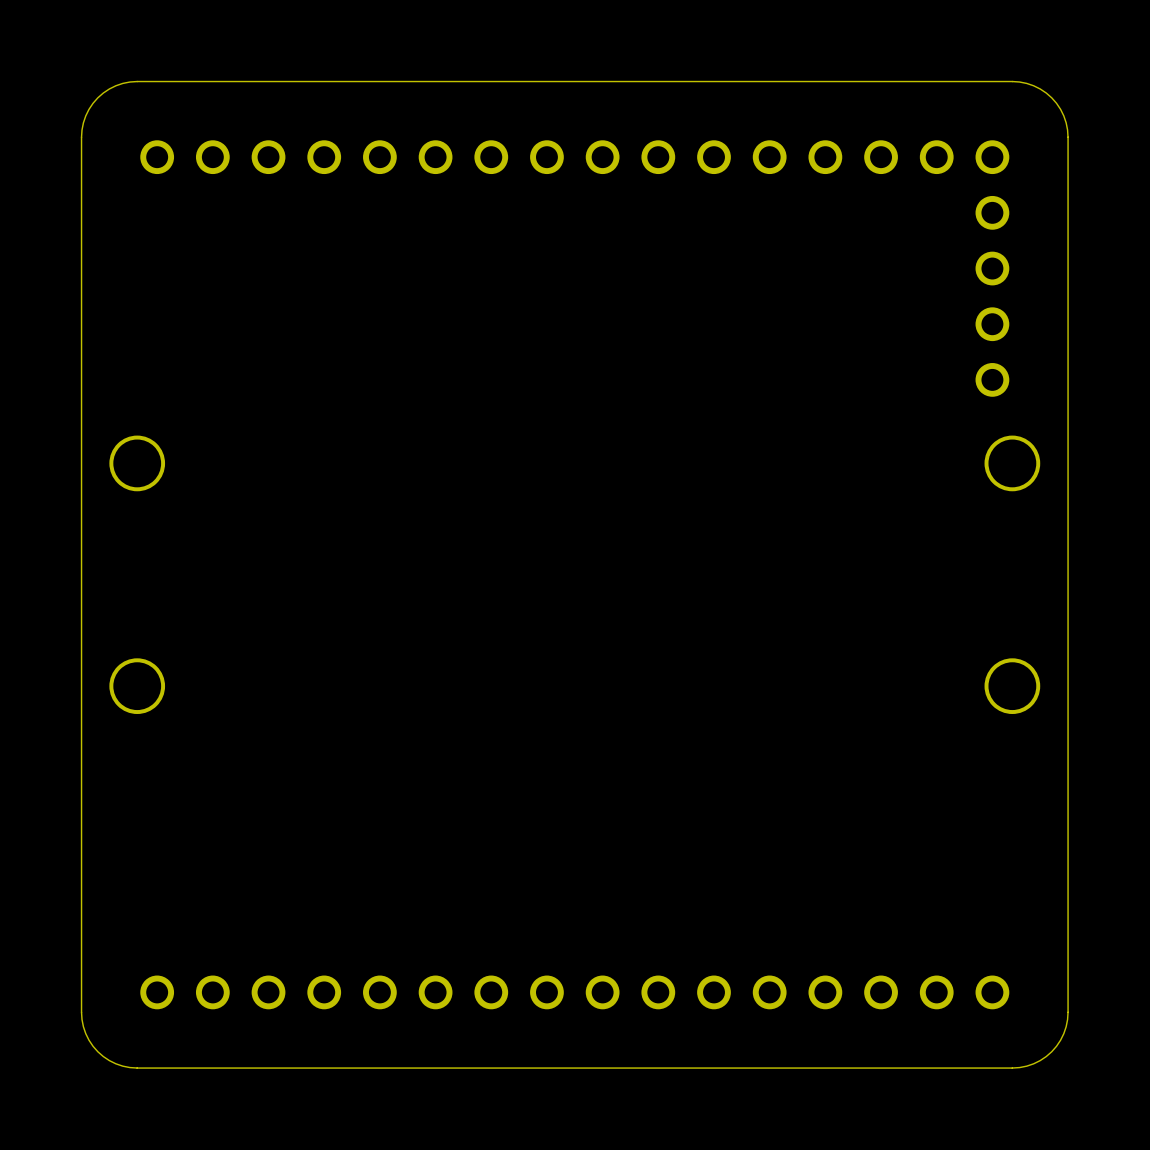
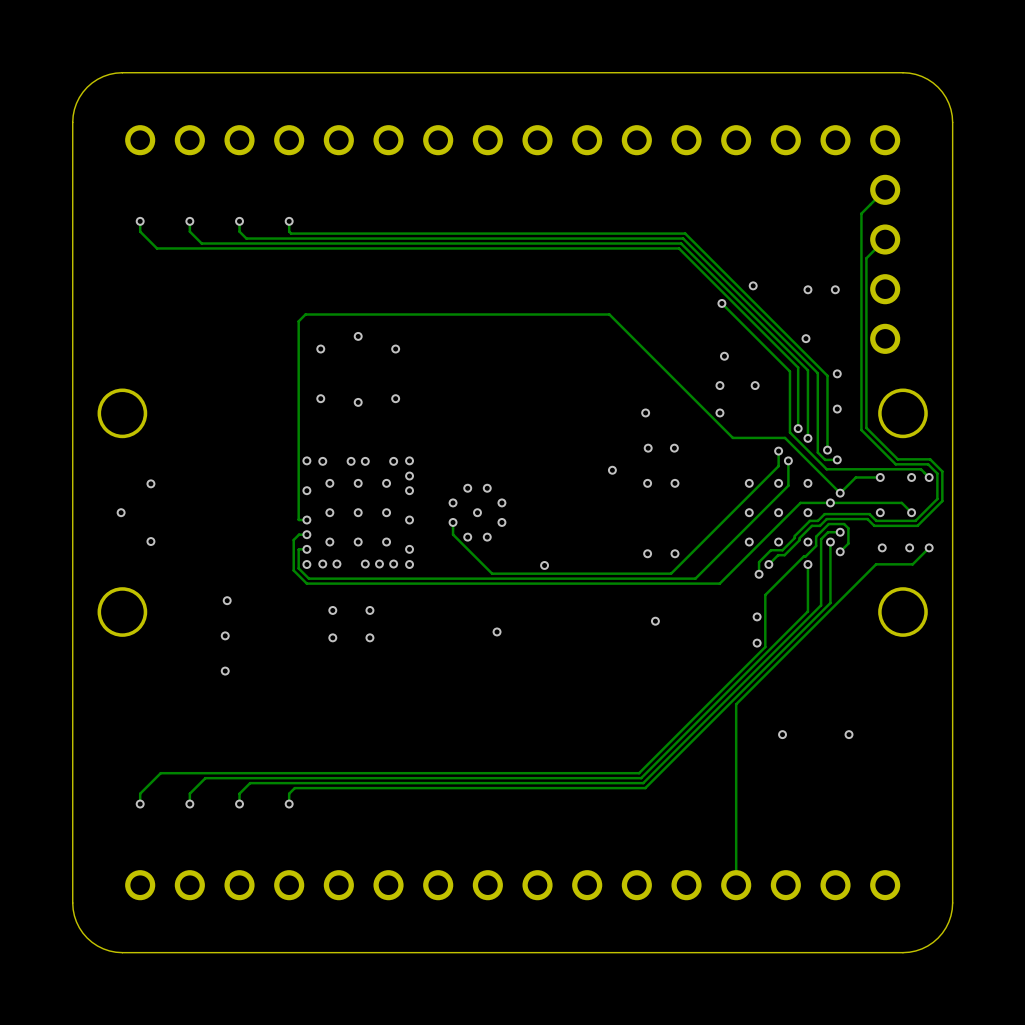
track: none -> (885, 189) (861, 213) (861, 429) (895, 464) (928, 464) (937, 473) (937, 499) (915, 520) (876, 520) (869, 514) (824, 514) (817, 520) (809, 520) (782, 550) (771, 550) (759, 562) (759, 574)
track: none -> (140, 221) (140, 231) (157, 248) (679, 248) (798, 367) (798, 428)
via: none -> (140, 221)
track: none -> (189, 221) (189, 231) (201, 243) (681, 243) (807, 370) (807, 438)
via: none -> (189, 221)
track: none -> (239, 221) (239, 231) (246, 238) (683, 238) (817, 373) (817, 452) (825, 459) (837, 459)
via: none -> (239, 221)
track: none -> (289, 221) (289, 231) (291, 233) (685, 233) (827, 375) (827, 450)
via: none -> (289, 221)
track: none -> (885, 239) (866, 258) (866, 427) (897, 459) (930, 459) (942, 471) (942, 501) (917, 525) (874, 525) (867, 519) (826, 519) (819, 525) (811, 525) (784, 555) (778, 555) (768, 564)
via: none -> (753, 285)
via: none -> (807, 289)
via: none -> (835, 289)
track: none -> (721, 303) (789, 371) (789, 432) (826, 469) (920, 469) (929, 477)
via: none -> (721, 303)
via: none -> (358, 336)
via: none -> (805, 338)
via: none -> (320, 349)
via: none -> (395, 349)
via: none -> (724, 356)
via: none -> (837, 373)
via: none -> (719, 385)
via: none -> (755, 385)
via: none -> (320, 398)
via: none -> (395, 398)
via: none -> (358, 402)
via: none -> (837, 409)
via: none -> (645, 412)
via: none -> (719, 412)
via: none -> (798, 428)
via: none -> (807, 438)
via: none -> (648, 448)
via: none -> (674, 448)
via: none -> (827, 450)
track: none -> (778, 451) (778, 466) (671, 573) (492, 573) (453, 534) (453, 522)
via: none -> (778, 451)
via: none -> (837, 459)
via: none -> (306, 460)
via: none -> (409, 460)
track: none -> (788, 460) (788, 485) (695, 578) (308, 578) (298, 568) (298, 549) (306, 549)
via: none -> (788, 460)
via: none -> (322, 461)
via: none -> (351, 461)
via: none -> (365, 461)
via: none -> (393, 461)
via: none -> (612, 470)
via: none -> (409, 476)
track: none -> (880, 477) (855, 477) (840, 493) (785, 437) (732, 437) (609, 314) (305, 314) (298, 321) (298, 519) (306, 520)
via: none -> (880, 477)
via: none -> (911, 477)
via: none -> (929, 477)
via: none -> (329, 483)
via: none -> (358, 483)
via: none -> (386, 483)
via: none -> (647, 483)
via: none -> (674, 483)
via: none -> (749, 483)
via: none -> (778, 483)
via: none -> (807, 483)
via: none -> (150, 483)
via: none -> (467, 488)
via: none -> (487, 488)
via: none -> (306, 490)
via: none -> (409, 490)
via: none -> (840, 493)
via: none -> (453, 502)
via: none -> (501, 502)
via: none -> (830, 502)
via: none -> (121, 512)
via: none -> (329, 512)
via: none -> (358, 512)
via: none -> (386, 512)
via: none -> (477, 512)
via: none -> (749, 512)
via: none -> (778, 512)
via: none -> (807, 512)
via: none -> (880, 512)
track: none -> (911, 512) (901, 502) (800, 502) (719, 583) (306, 583) (293, 570) (293, 539) (299, 534) (306, 534)
via: none -> (911, 512)
via: none -> (306, 520)
via: none -> (409, 520)
via: none -> (453, 522)
via: none -> (501, 522)
track: none -> (840, 532) (828, 532) (821, 539) (821, 605) (643, 783) (250, 783) (239, 793) (239, 804)
via: none -> (840, 532)
via: none -> (306, 534)
via: none -> (467, 537)
via: none -> (487, 537)
via: none -> (150, 541)
via: none -> (329, 542)
via: none -> (358, 542)
via: none -> (386, 542)
via: none -> (749, 542)
via: none -> (778, 542)
via: none -> (807, 542)
track: none -> (830, 542) (830, 602) (645, 788) (294, 788) (289, 793) (289, 804)
via: none -> (830, 542)
via: none -> (882, 547)
via: none -> (909, 547)
track: none -> (929, 547) (912, 564) (876, 564) (736, 704) (736, 885)
via: none -> (929, 547)
via: none -> (306, 549)
via: none -> (409, 549)
track: none -> (840, 551) (848, 543) (848, 528) (844, 524) (828, 524) (816, 536) (816, 545) (765, 595) (765, 647) (639, 773) (160, 773) (140, 793) (140, 804)
via: none -> (840, 551)
via: none -> (647, 553)
via: none -> (674, 553)
via: none -> (306, 564)
via: none -> (322, 564)
via: none -> (336, 564)
via: none -> (365, 564)
via: none -> (379, 564)
via: none -> (393, 564)
via: none -> (409, 564)
via: none -> (768, 564)
track: none -> (807, 564) (807, 611) (641, 778) (205, 778) (189, 793) (189, 804)
via: none -> (807, 564)
via: none -> (544, 565)
via: none -> (759, 574)
via: none -> (227, 600)
via: none -> (332, 610)
via: none -> (369, 610)
via: none -> (757, 616)
via: none -> (655, 621)
via: none -> (497, 631)
via: none -> (225, 635)
via: none -> (332, 637)
via: none -> (369, 637)
via: none -> (757, 643)
via: none -> (225, 671)
via: none -> (782, 734)
via: none -> (849, 734)
via: none -> (140, 804)
via: none -> (189, 804)
via: none -> (239, 804)
via: none -> (289, 804)

